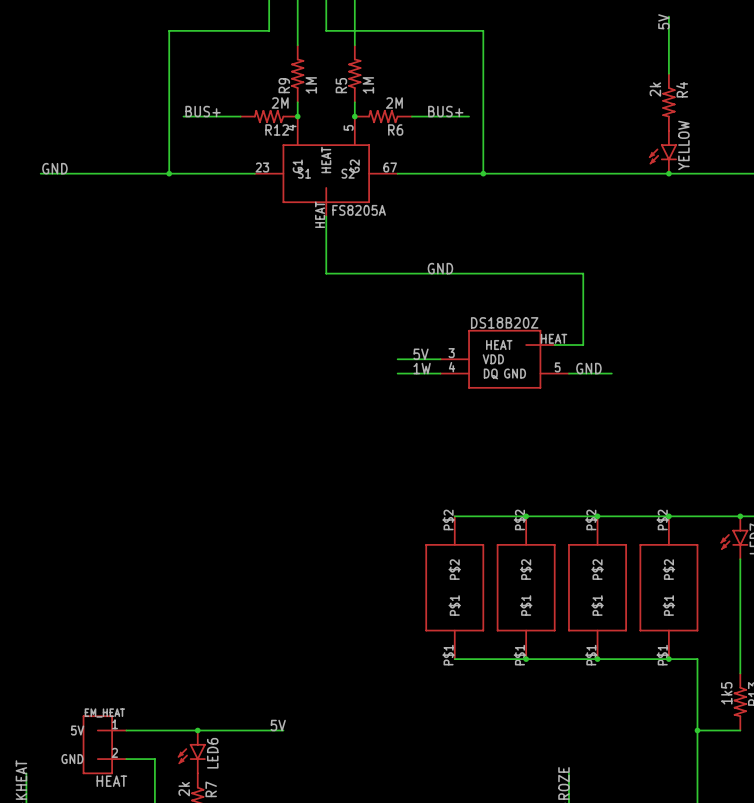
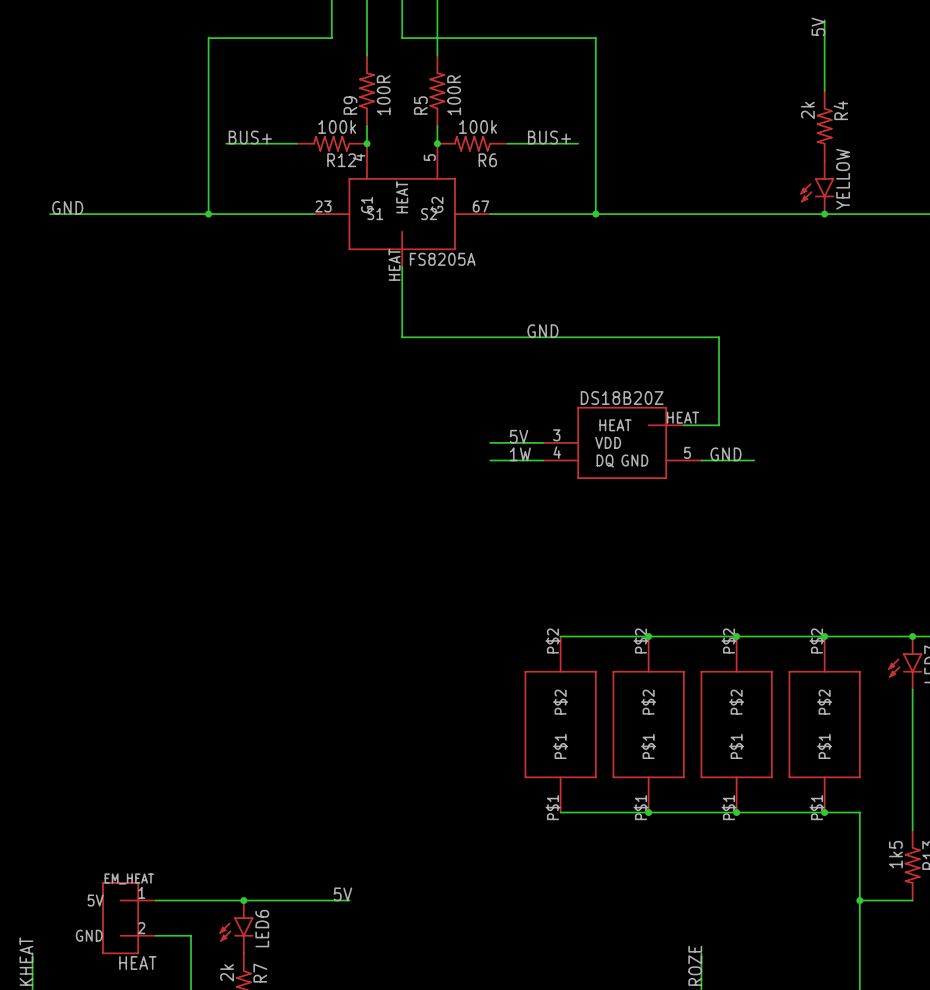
R9 value: 1M (311, 85) -> 100R (383, 95)
R5 value: 1M (368, 85) -> 100R (454, 95)
R12 value: 2M (280, 102) -> 100k (337, 126)
R6 value: 2M (394, 102) -> 100k (478, 126)

